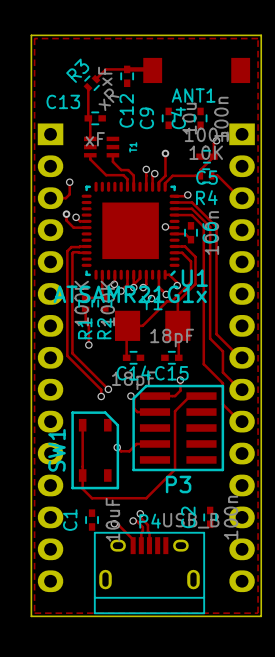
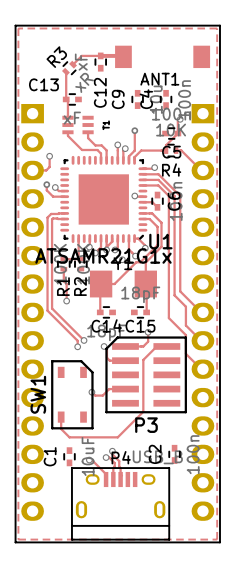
track: (82, 425) (82, 475) -> none

